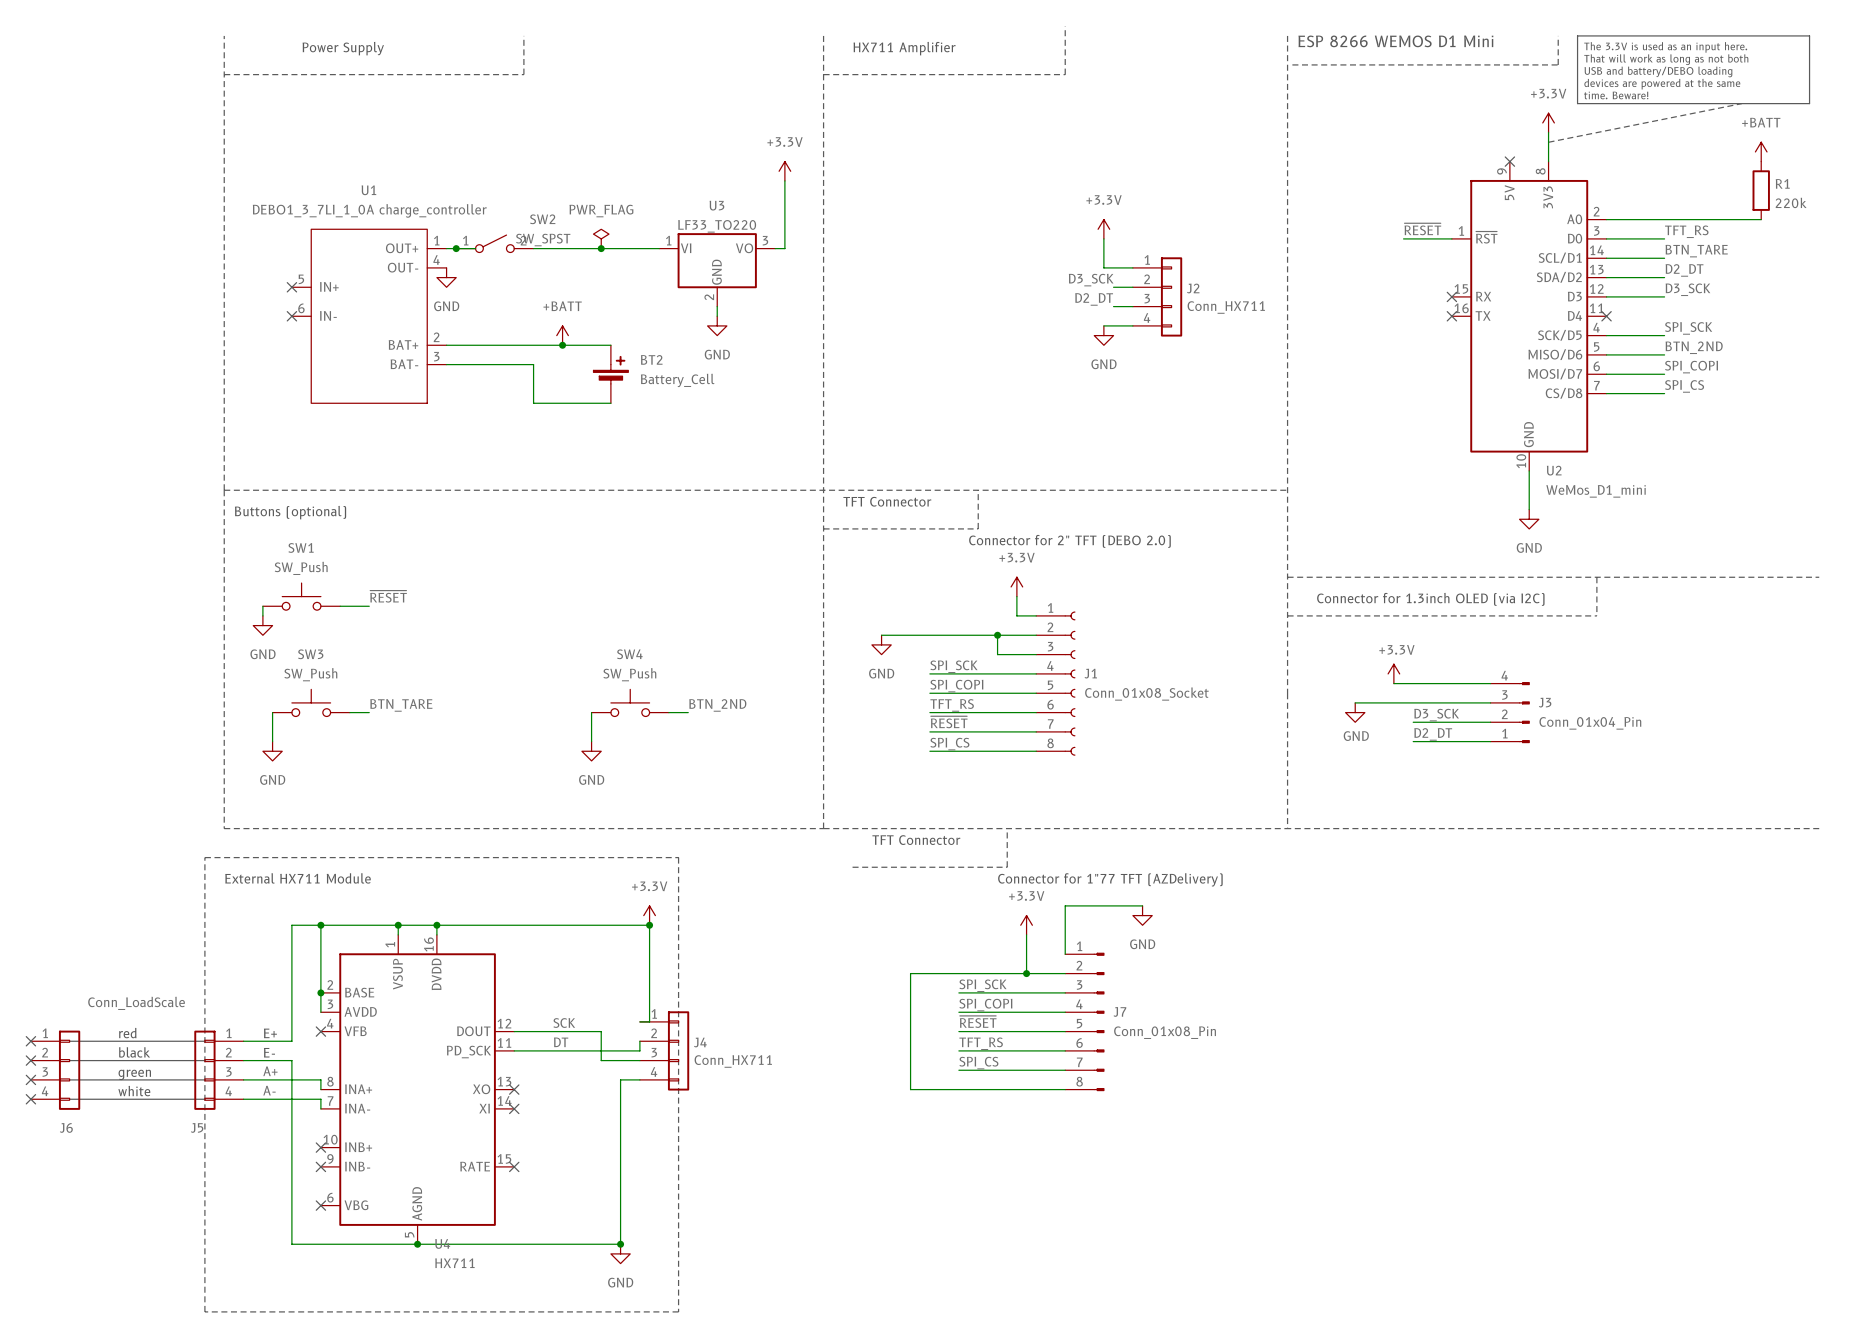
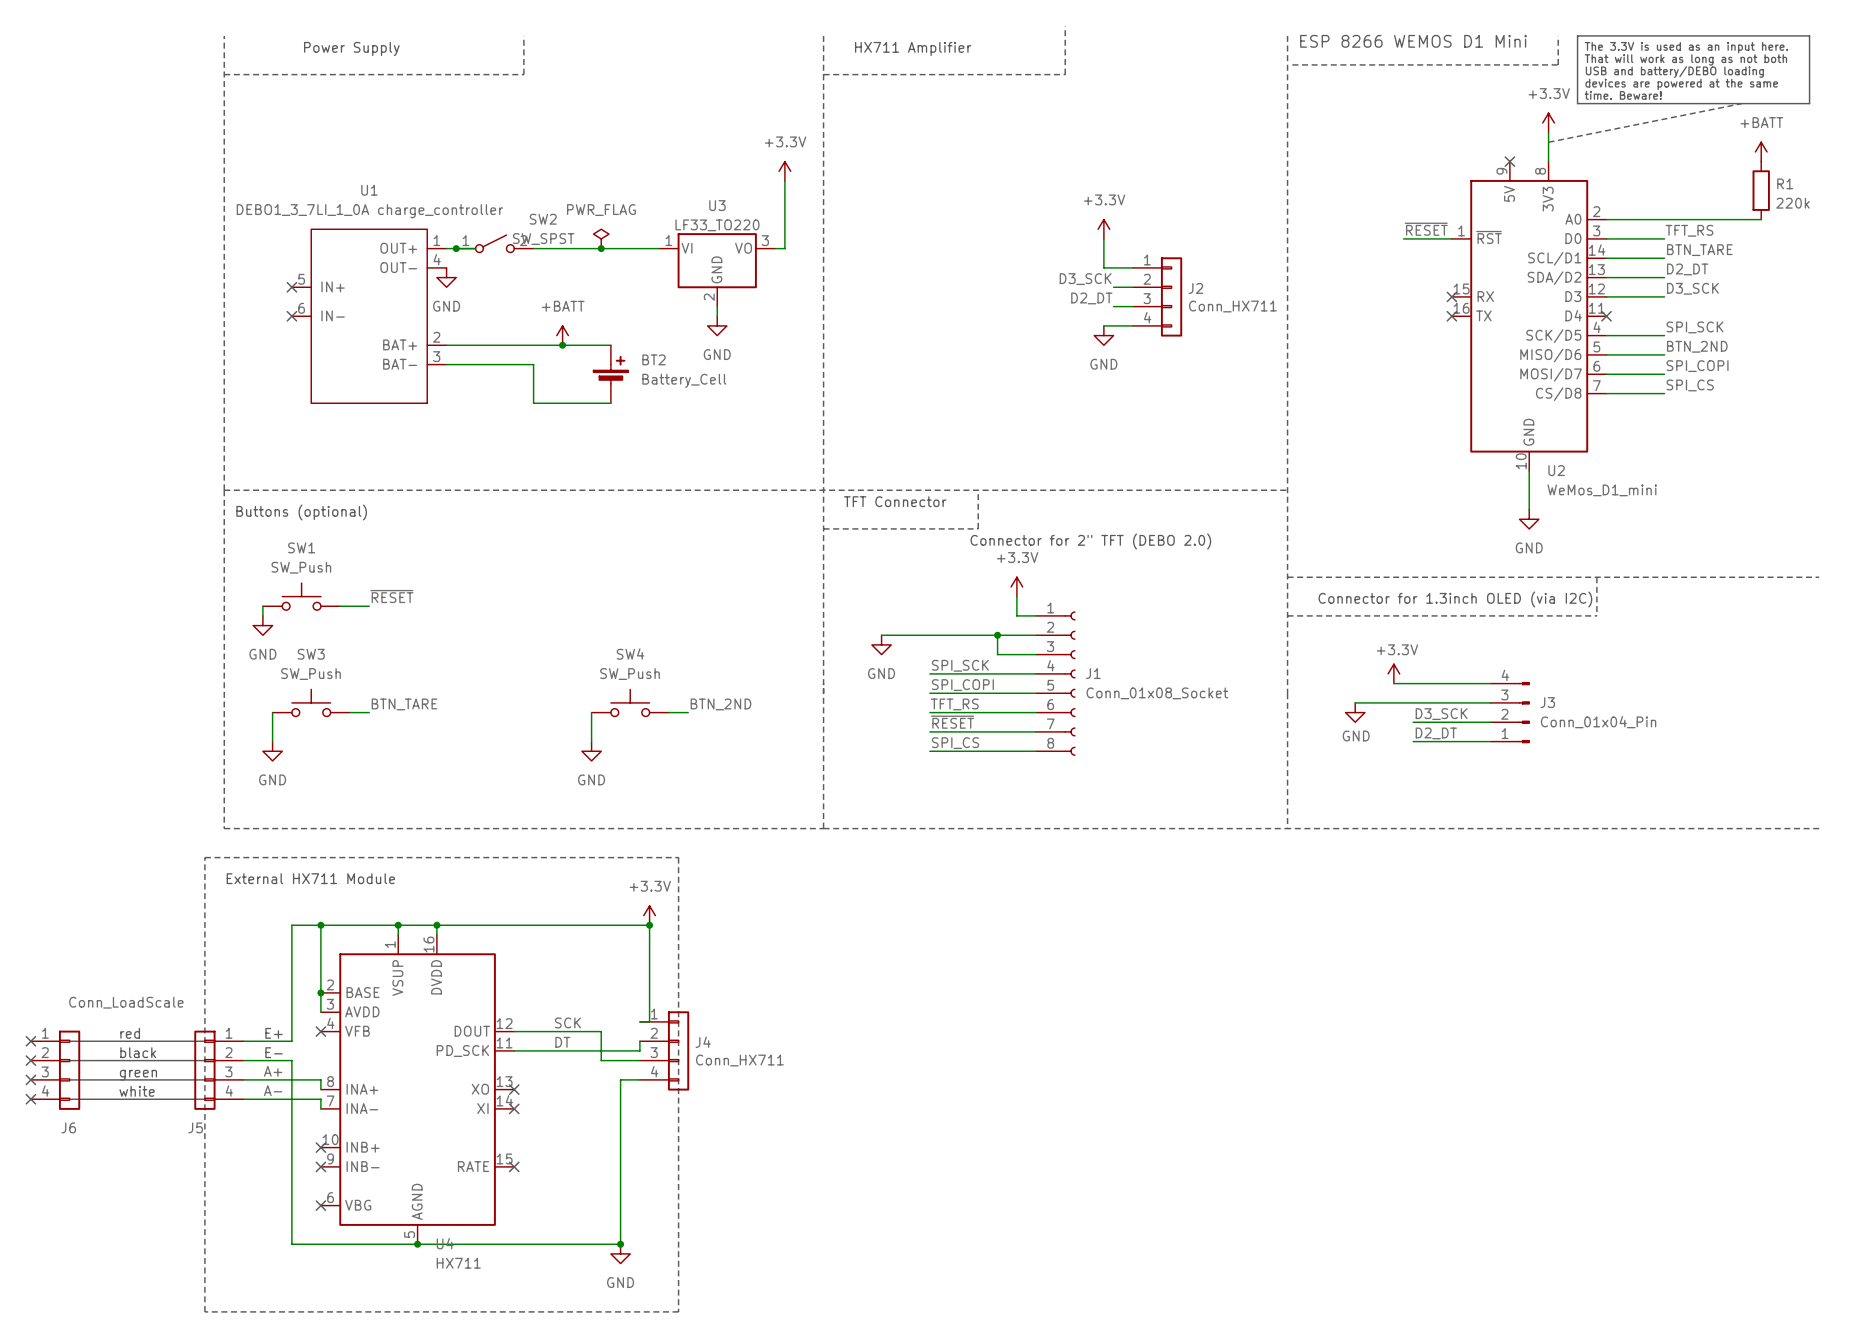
line: (1007, 828) (1007, 867) (852, 867) -> none
text: TFT Connector (916, 840) -> none
text: Connector for 1"77 TFT (AZDelivery) (1110, 879) -> none
wire: (1142, 905) (1065, 905) (1065, 954) -> none
power symbol: GND (1142, 915) -> none
power symbol: +3.3V (1026, 925) -> none
wire: (1026, 934) (1026, 973) -> none
junction: (1026, 973) -> none
wire: (1065, 973) (910, 973) (910, 1089) (1065, 1089) -> none
label: SPI_SCK (982, 985) -> none
wire: (958, 992) (1065, 992) -> none
label: SPI_COPI (985, 1005) -> none
wire: (958, 1012) (1065, 1012) -> none
label: ~{RESET} (978, 1021) -> none
J7: Conn_01x08_Pin (1084, 1021) -> none
wire: (958, 1031) (1065, 1031) -> none
label: TFT_RS (981, 1043) -> none
wire: (958, 1050) (1065, 1050) -> none
label: SPI_CS (978, 1063) -> none
wire: (958, 1070) (1065, 1070) -> none

